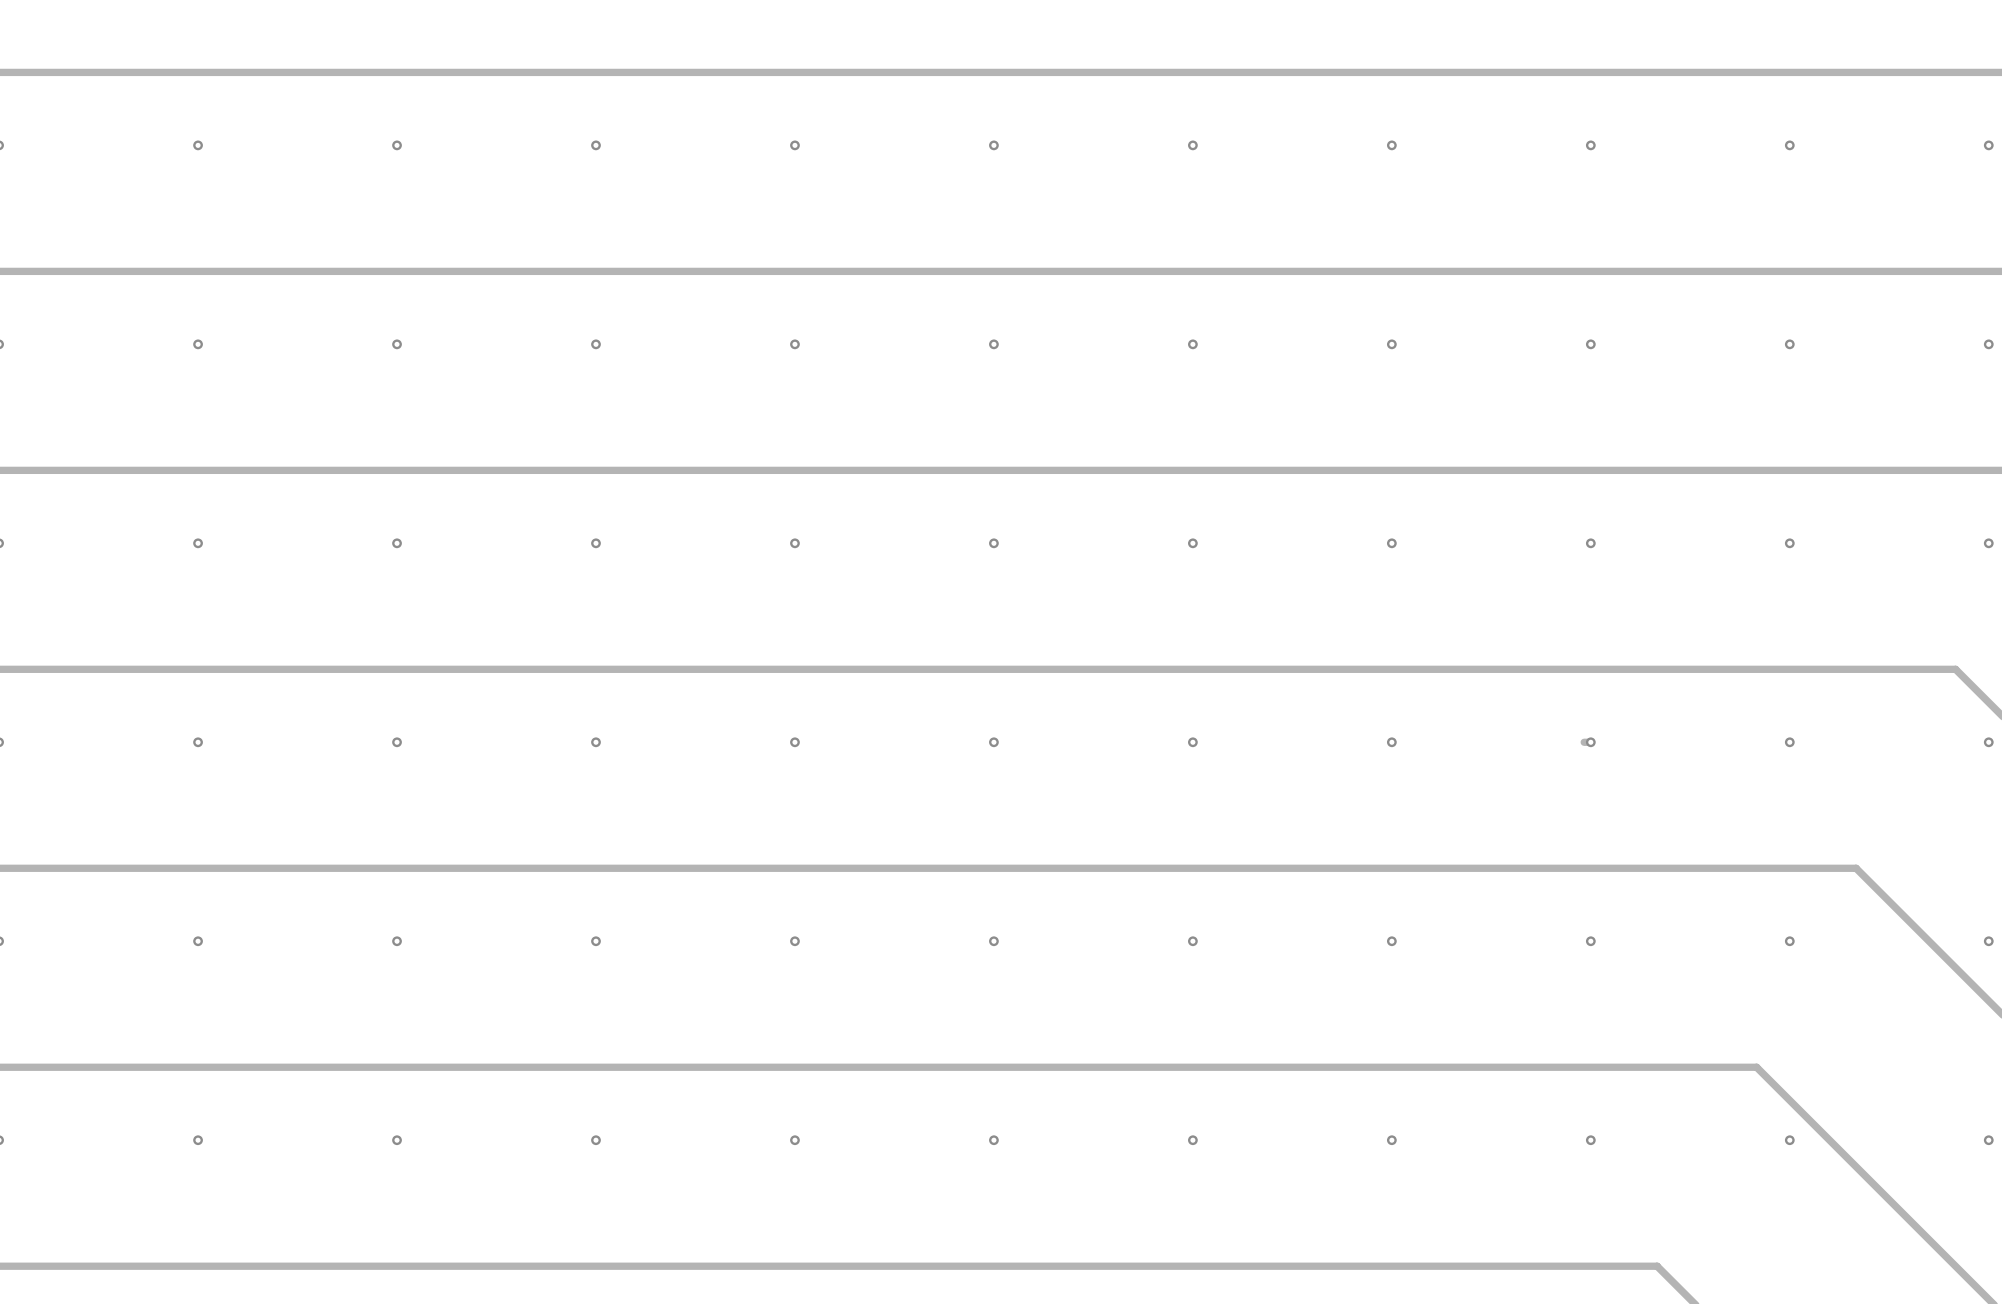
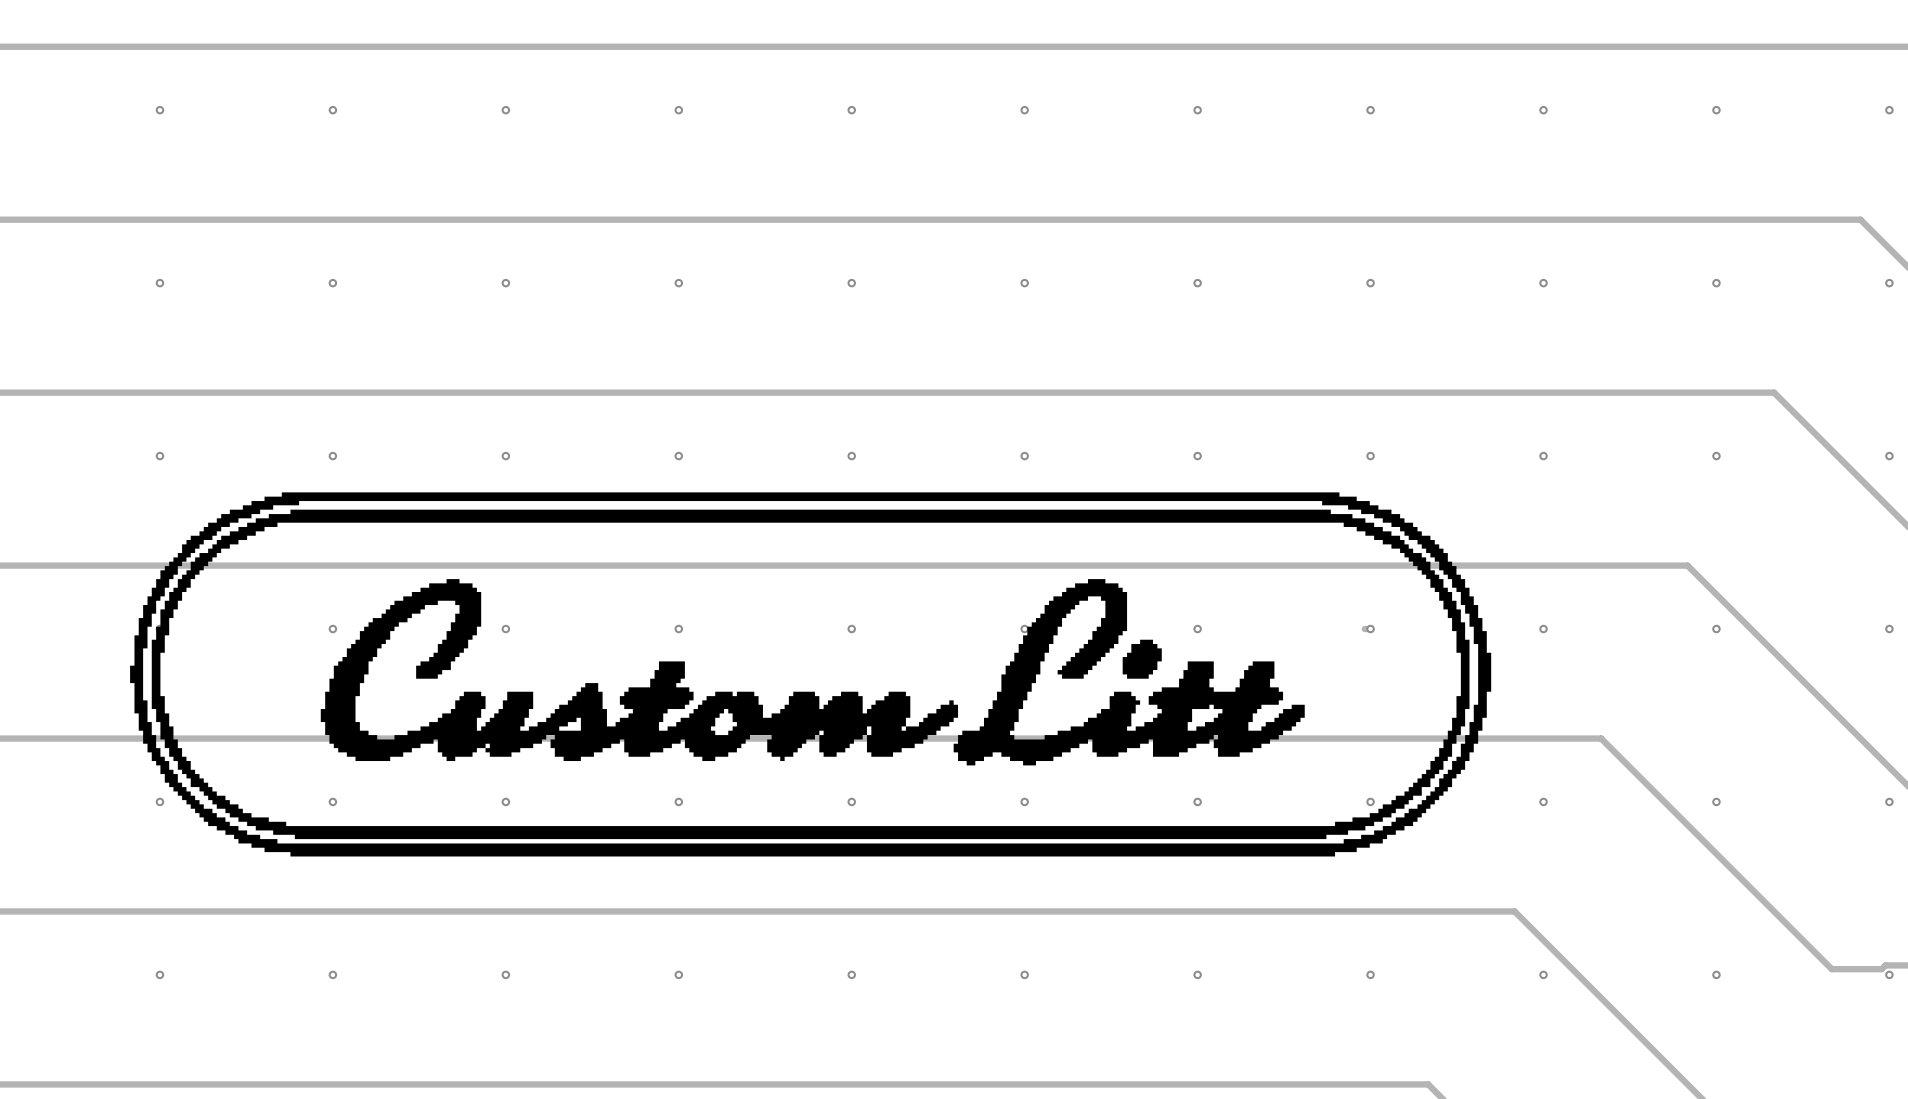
drawing: none -> [130, 492, 1492, 857]

